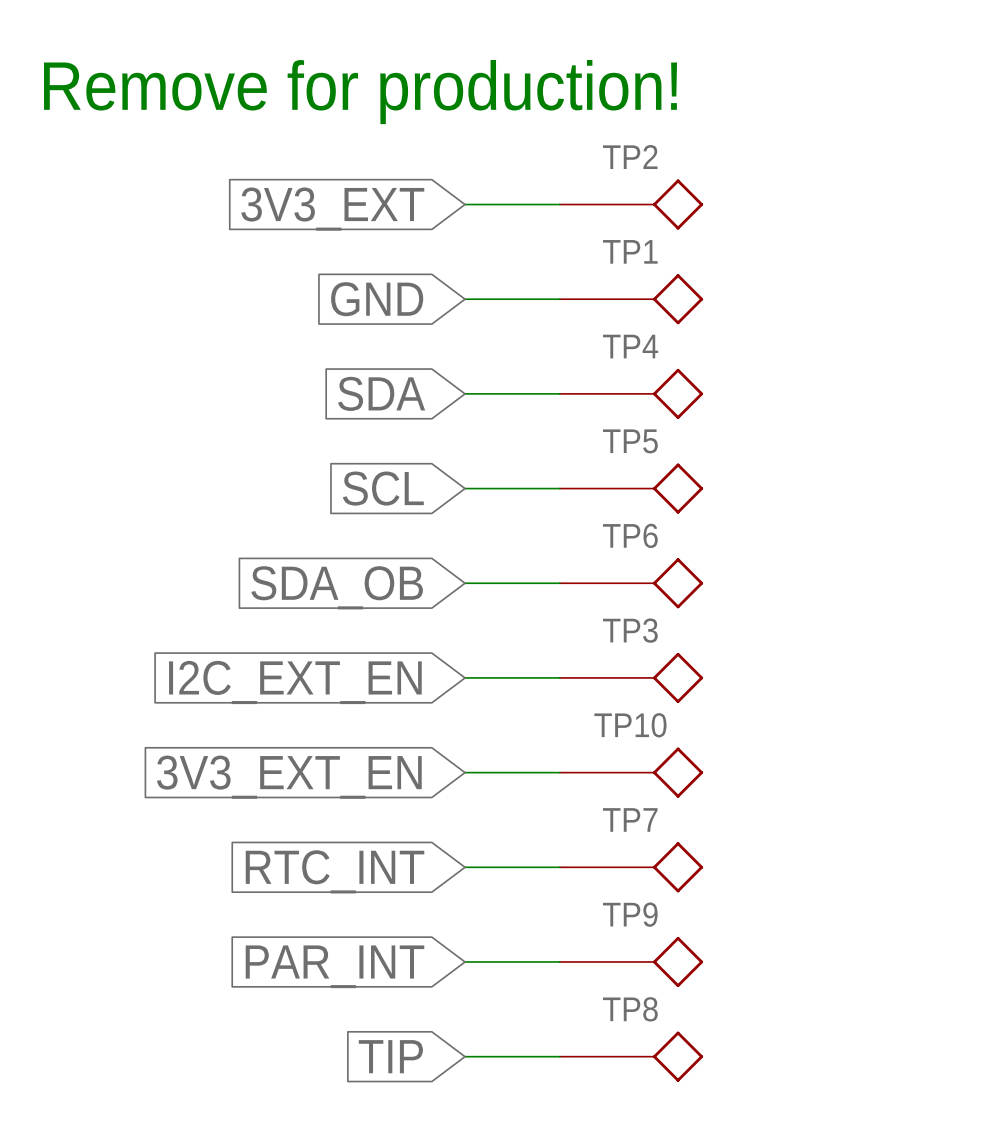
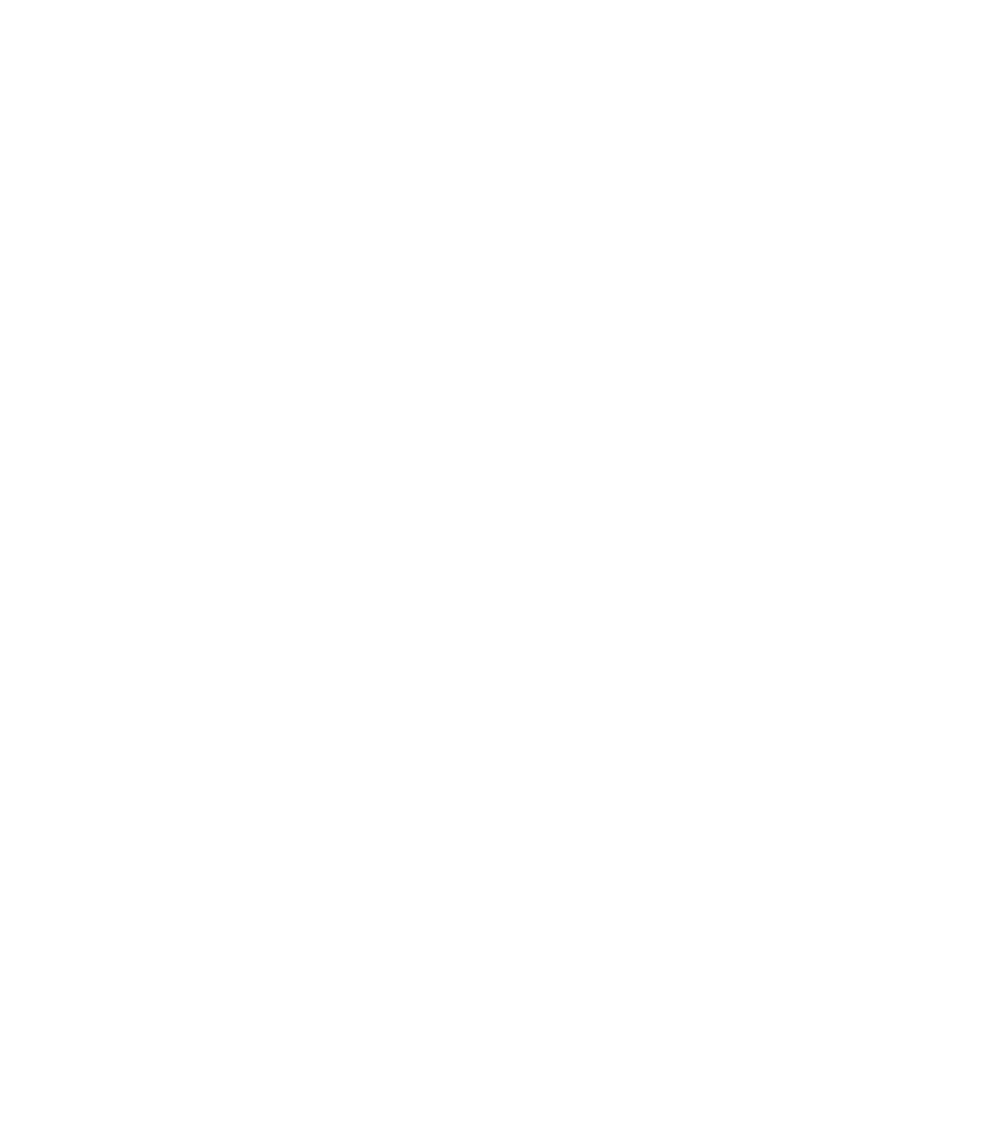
text: Remove for production! (360, 92) -> none
wire: (465, 204) (559, 204) -> none
TP2: (631, 204) -> none
global label: 3V3_EXT (332, 209) -> none
global label: GND (377, 299) -> none
wire: (465, 299) (559, 299) -> none
TP1: (631, 299) -> none
global label: SDA (381, 393) -> none
wire: (465, 393) (559, 393) -> none
TP4: (631, 393) -> none
global label: SCL (383, 488) -> none
wire: (465, 488) (559, 488) -> none
TP5: (631, 488) -> none
wire: (465, 583) (559, 583) -> none
TP6: (631, 583) -> none
global label: SDA_OB (337, 587) -> none
wire: (465, 677) (559, 677) -> none
TP3: (631, 677) -> none
global label: I2C_EXT_EN (295, 682) -> none
wire: (465, 772) (559, 772) -> none
TP10: (631, 772) -> none
global label: 3V3_EXT_EN (289, 777) -> none
wire: (465, 867) (559, 867) -> none
TP7: (631, 867) -> none
global label: RTC_INT (335, 871) -> none
wire: (465, 961) (559, 961) -> none
TP9: (631, 961) -> none
global label: PAR_INT (334, 966) -> none
global label: TIP (390, 1056) -> none
wire: (465, 1056) (559, 1056) -> none
TP8: (631, 1056) -> none

